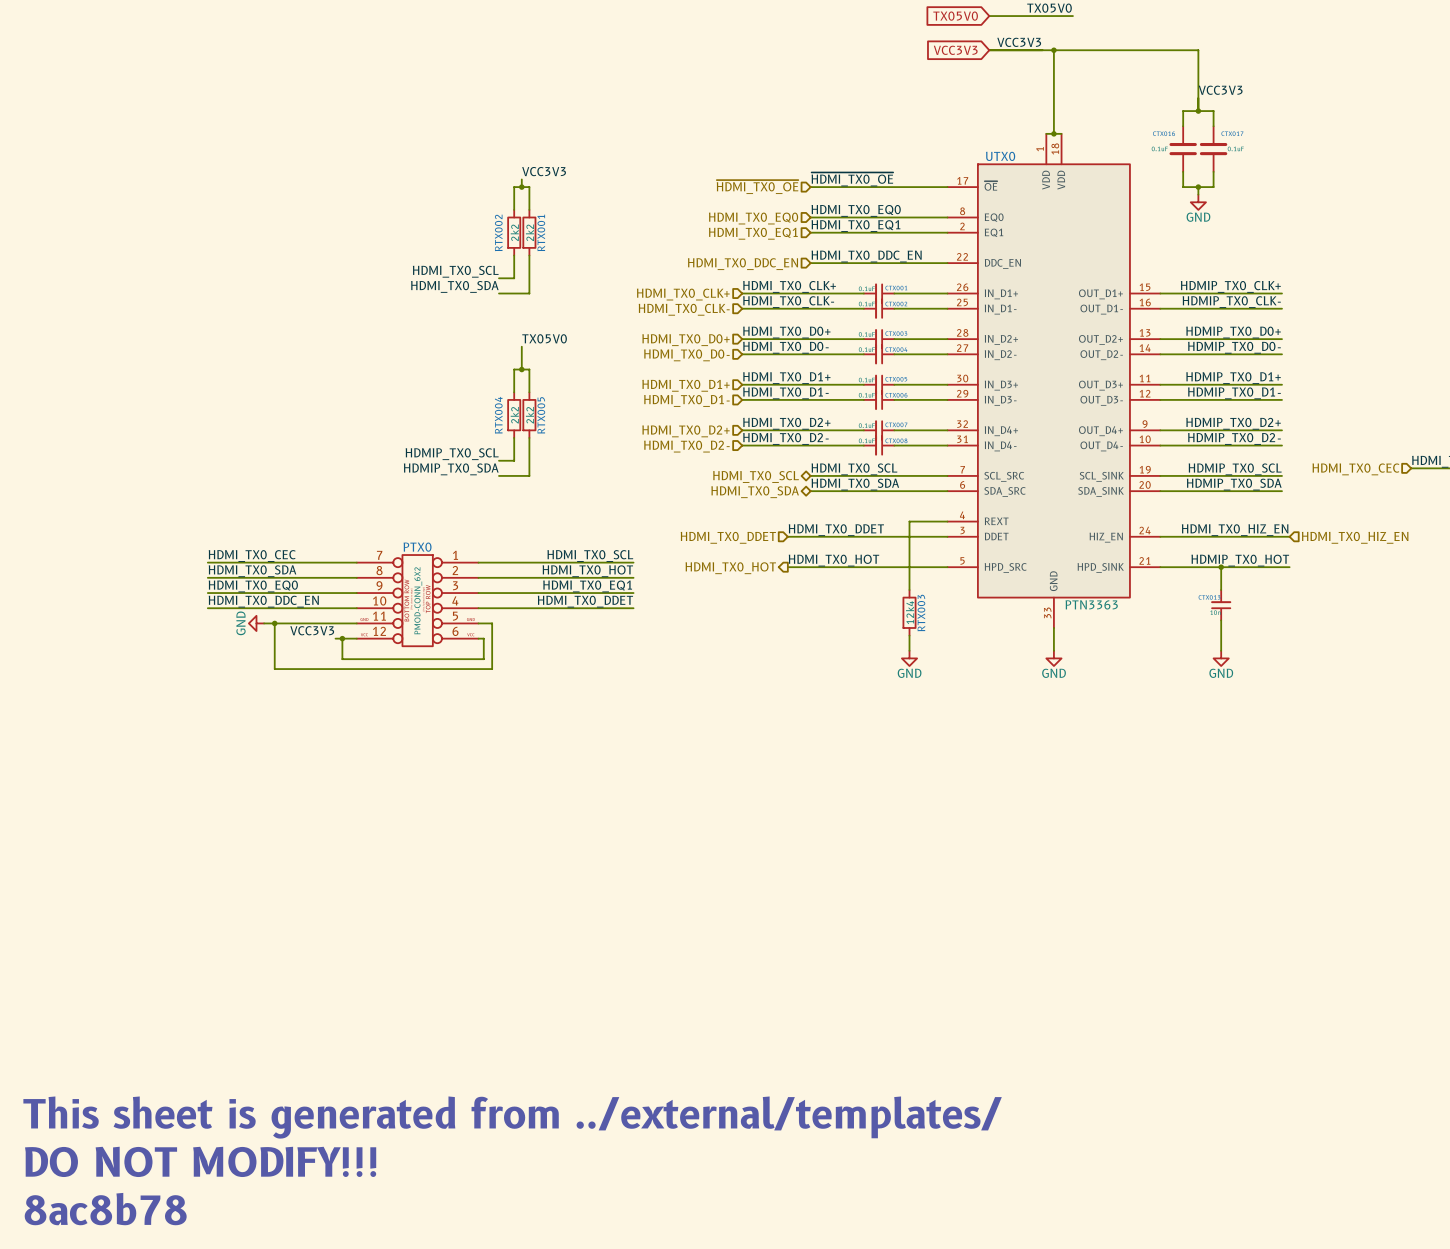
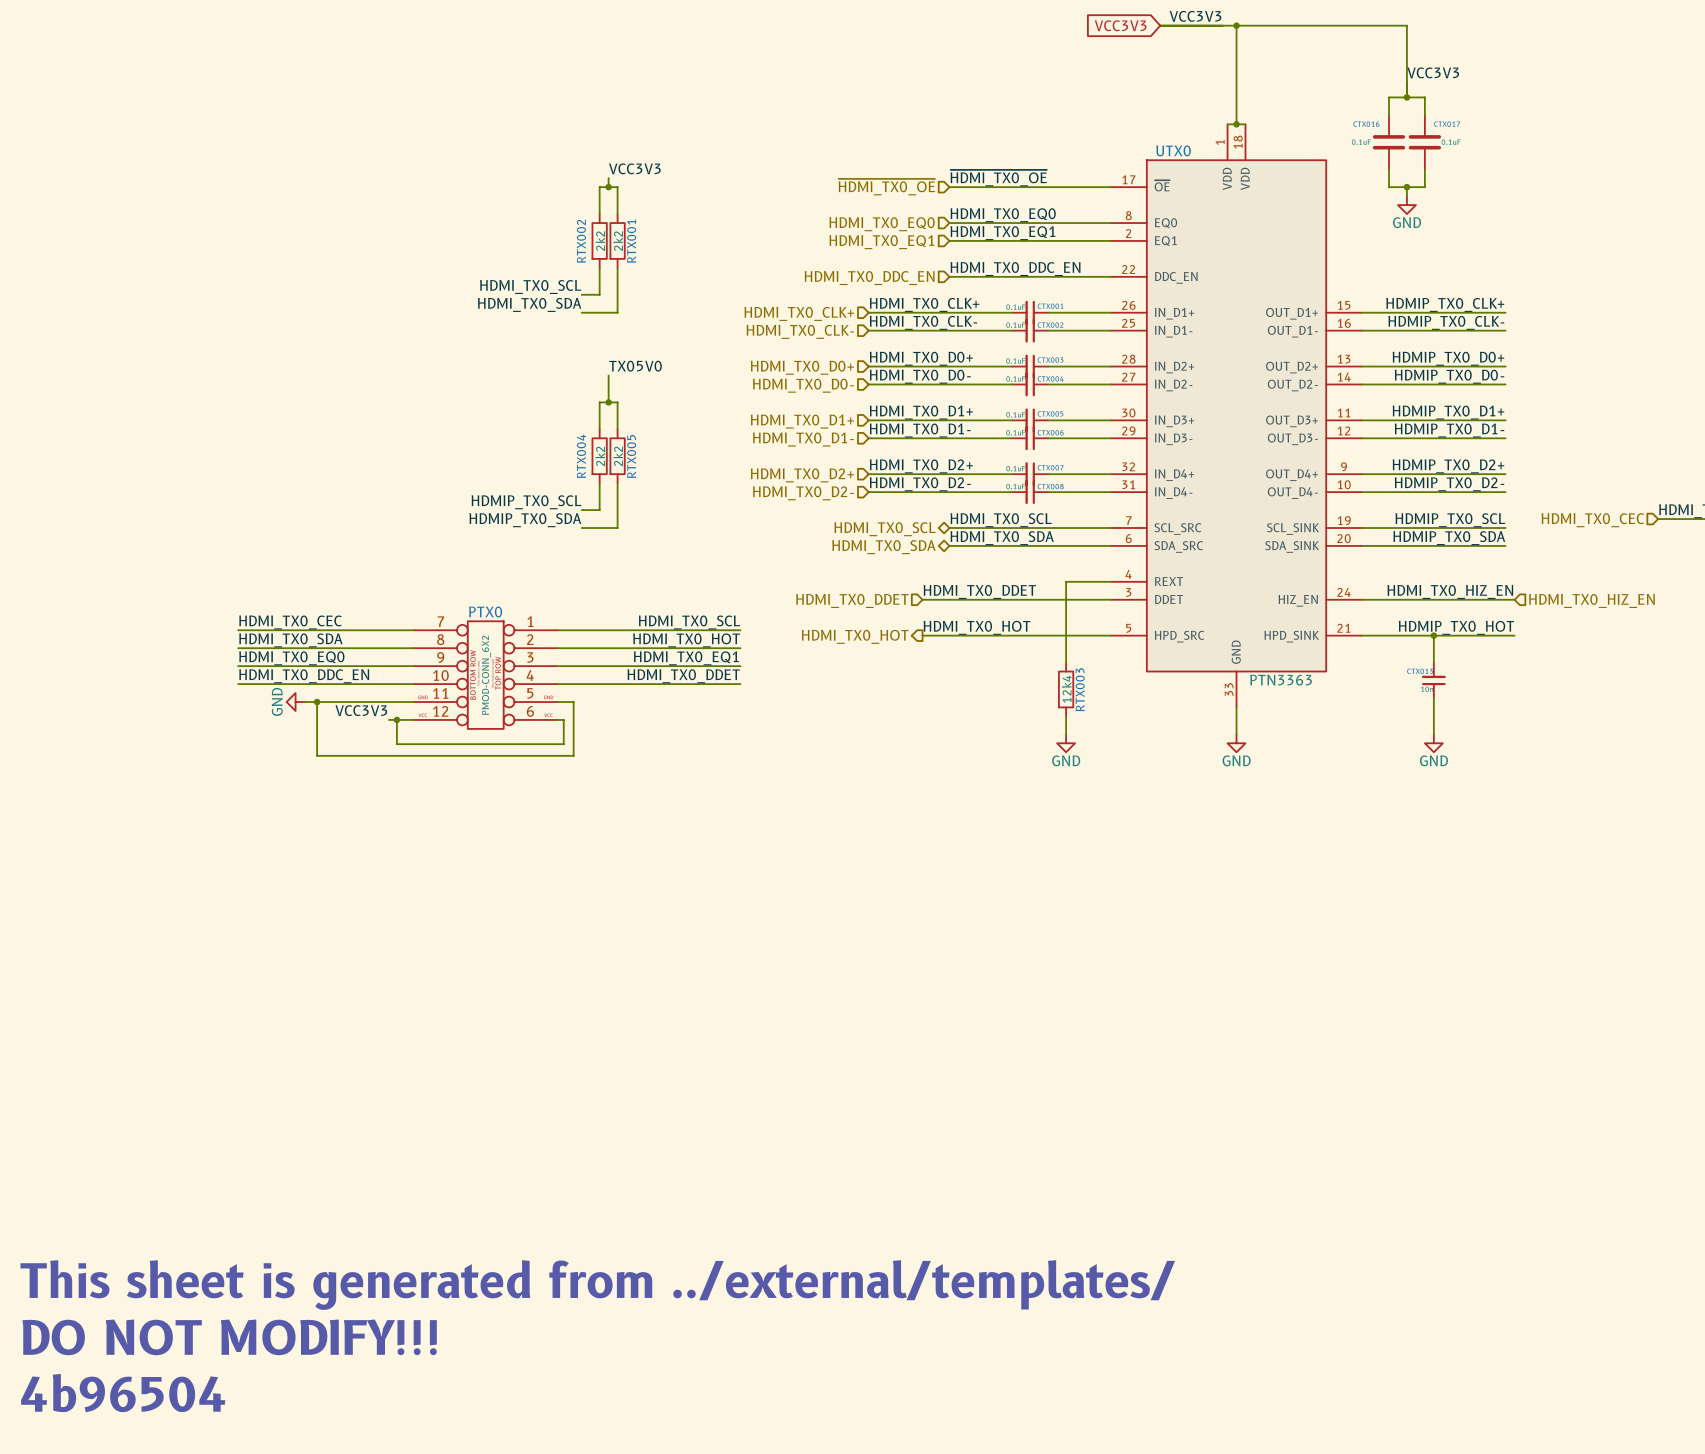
text: 8ac8b78 (105, 1209) -> 4b96504 (123, 1393)

